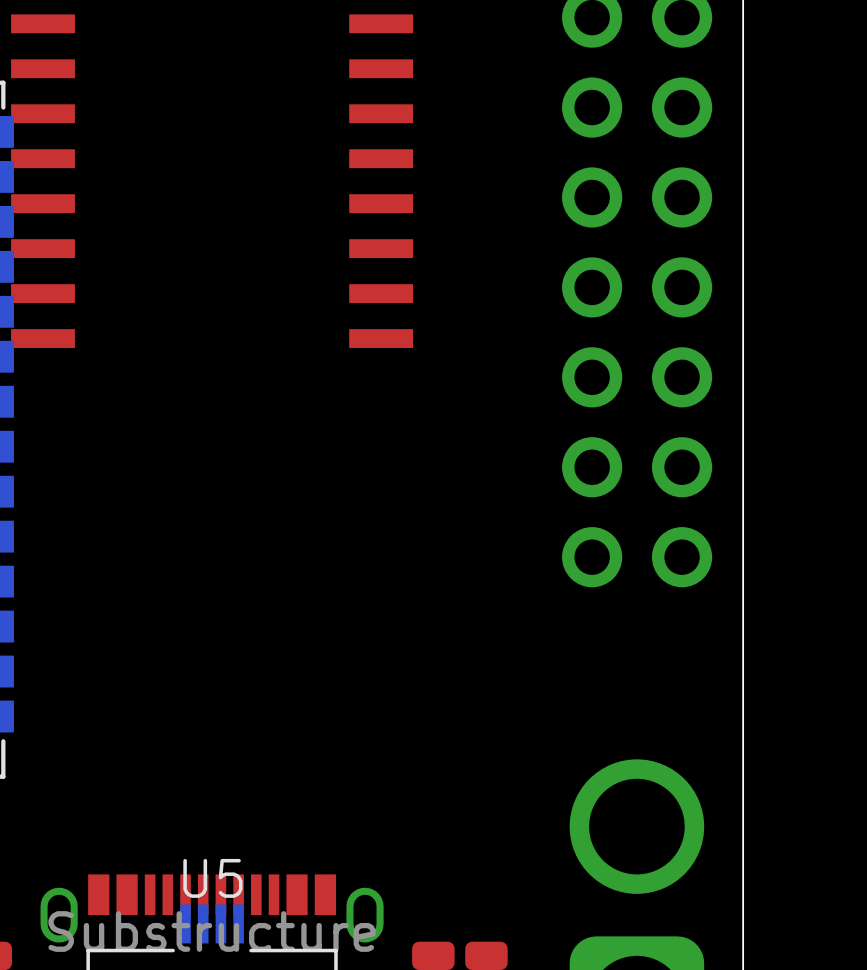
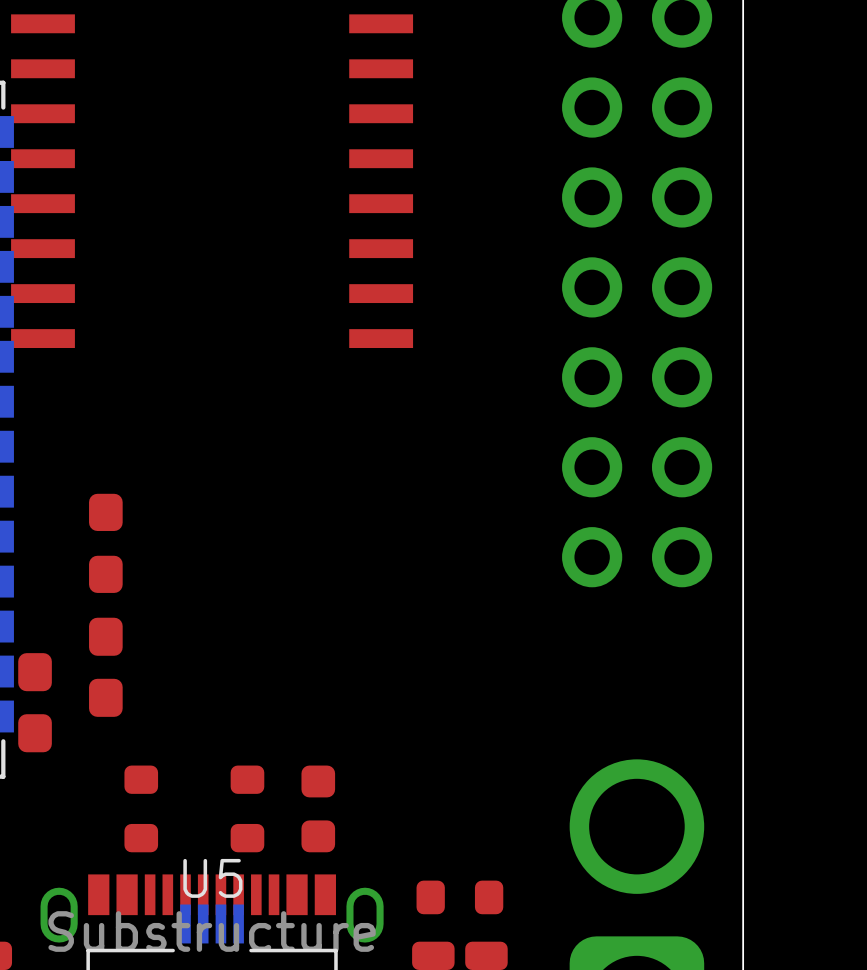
part: none -> (105, 543)
part: none -> (105, 667)
part: none -> (35, 702)
part: none -> (141, 808)
part: none -> (247, 808)
part: none -> (318, 808)
part: none -> (459, 897)

